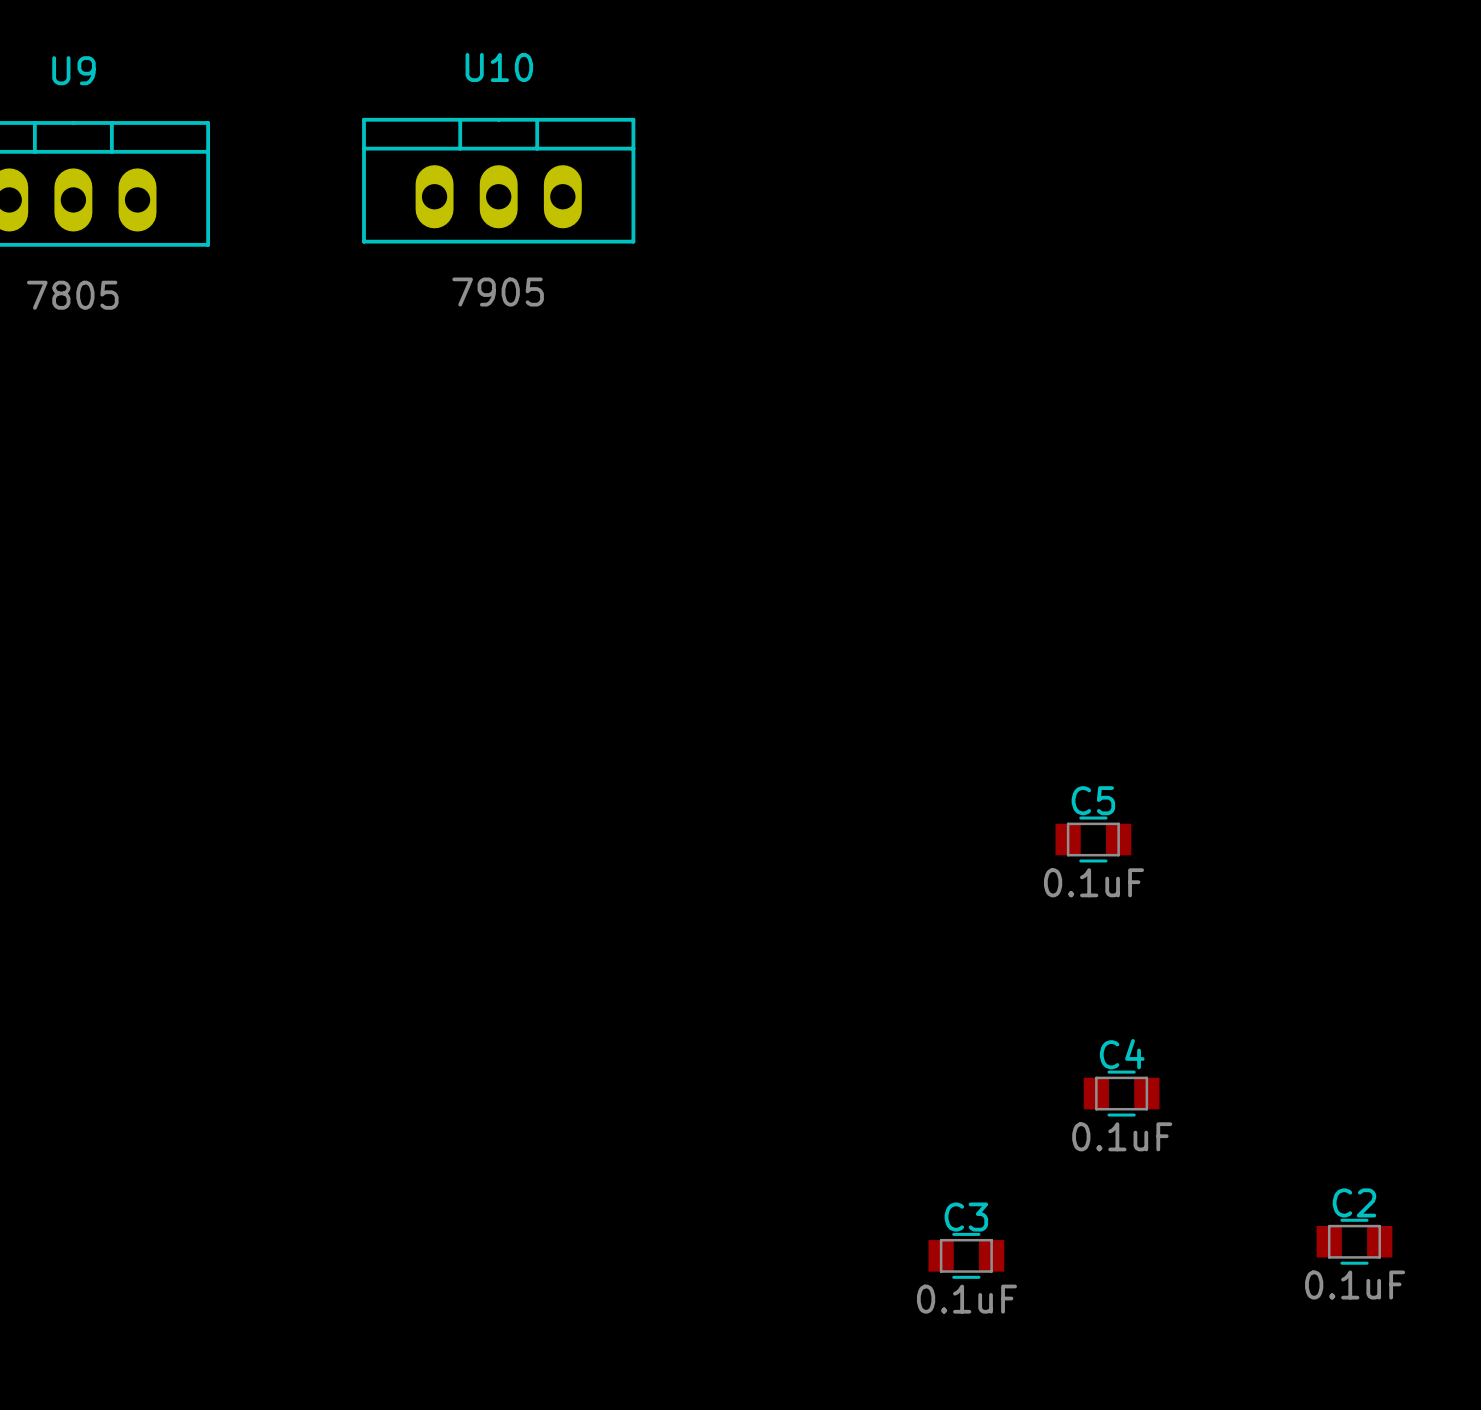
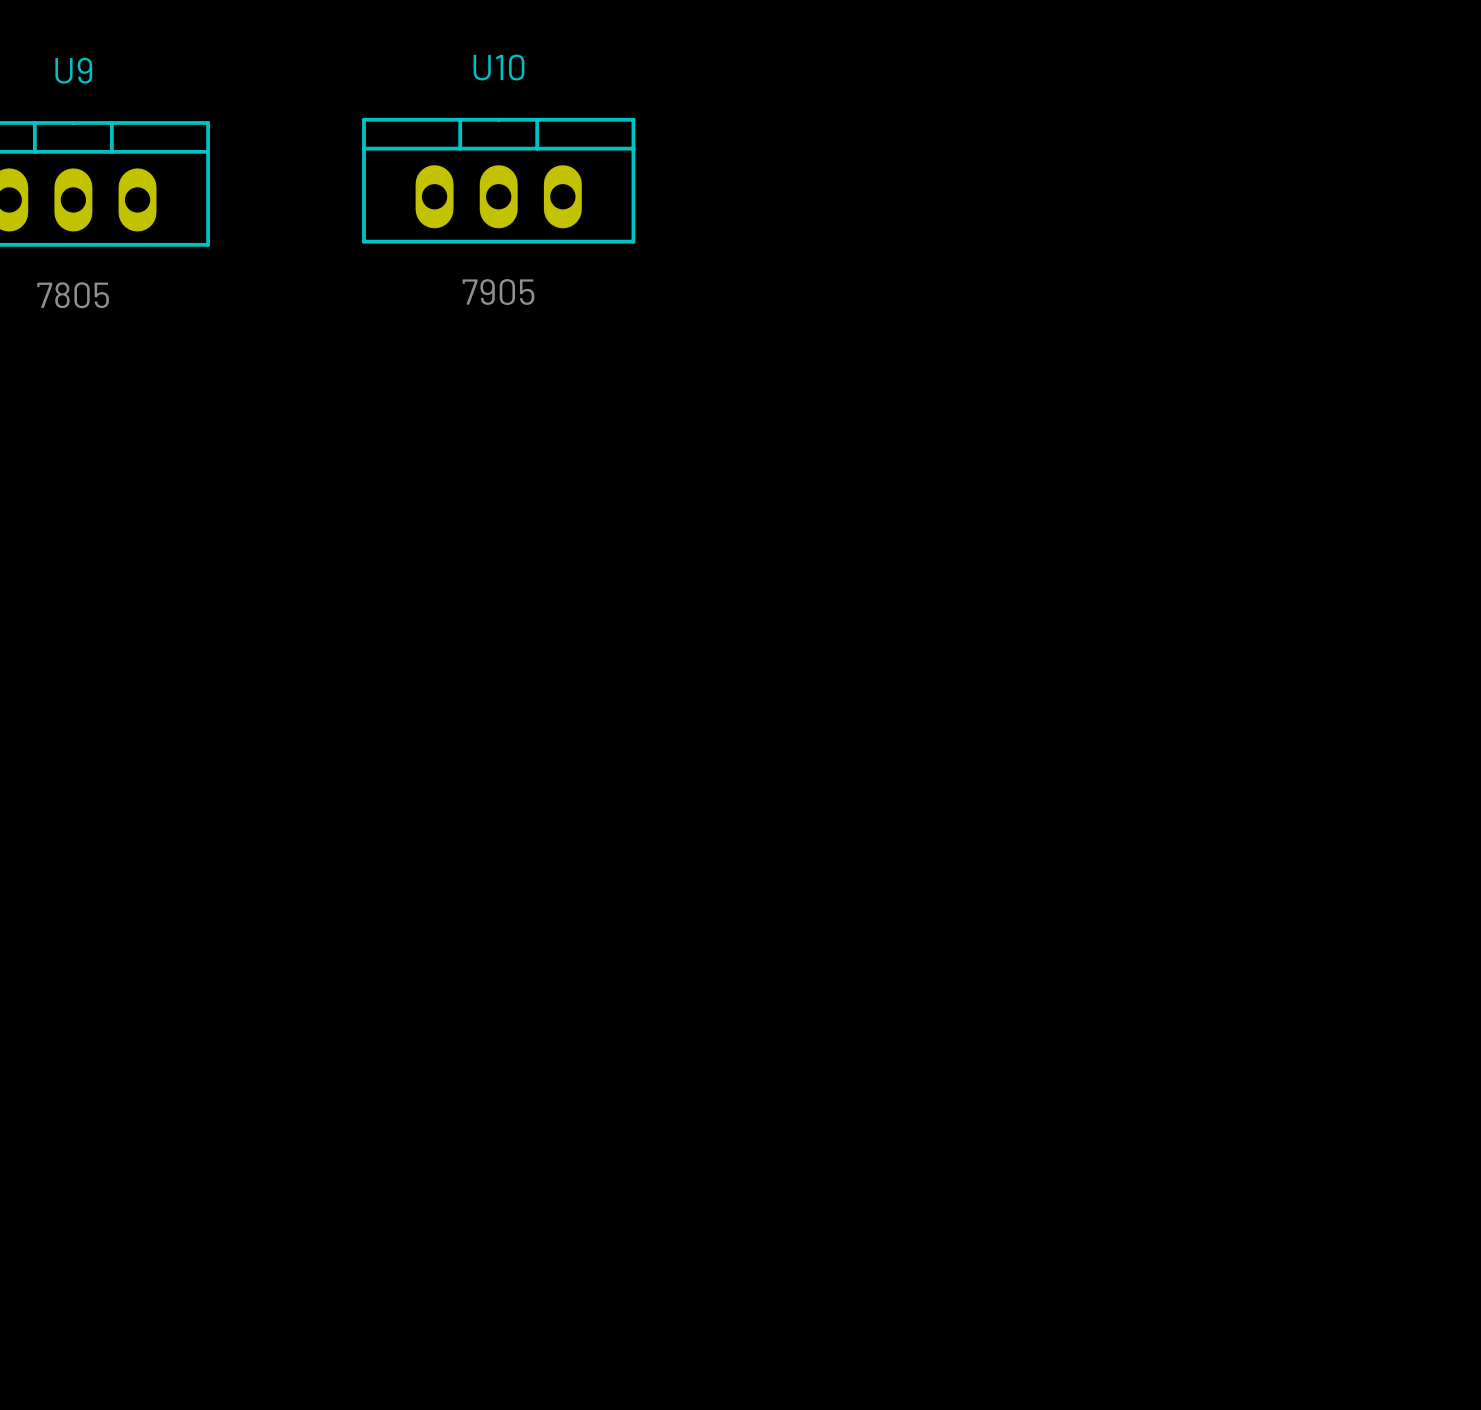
C5: 0.1uF (1093, 839) -> none
C4: 0.1uF (1121, 1093) -> none
C2: 0.1uF (1354, 1241) -> none
C3: 0.1uF (966, 1255) -> none

